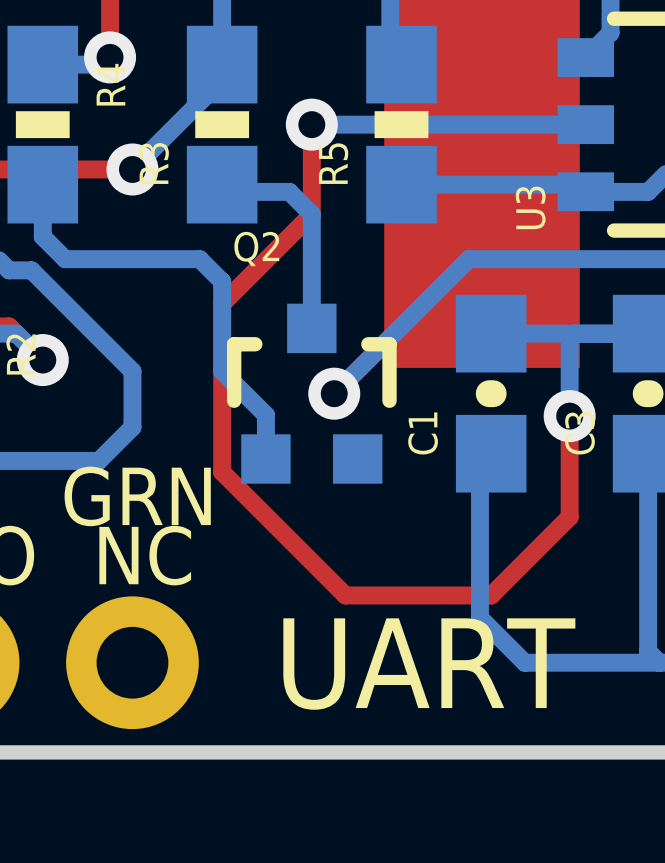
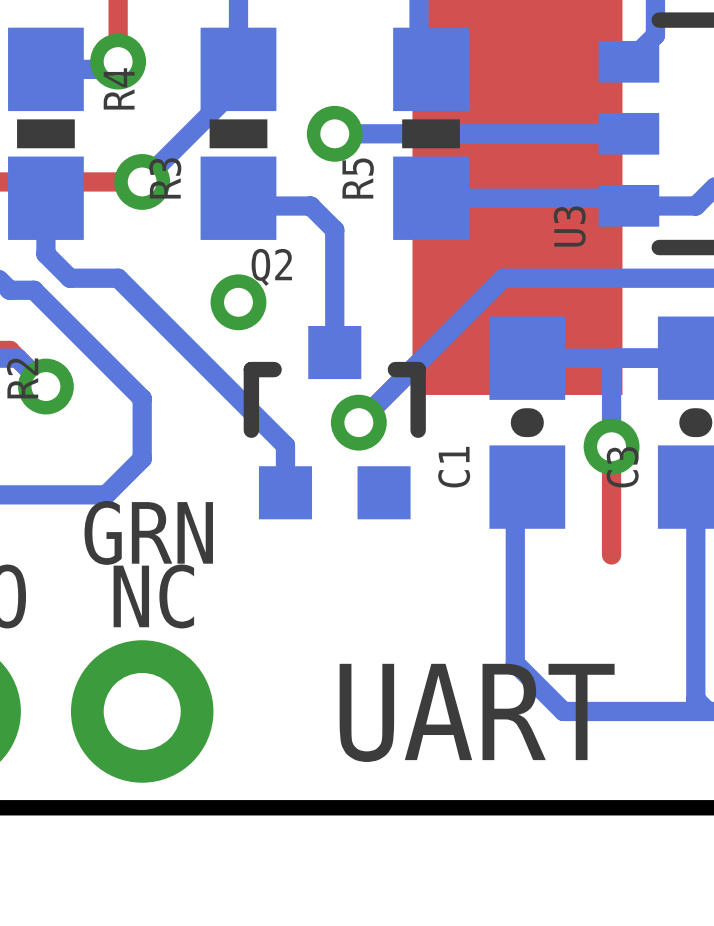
top track: (311, 124) (311, 214) (222, 304) (222, 472) (345, 595) (491, 595) (569, 517) -> none
bottom track: (110, 259) (199, 259) (222, 281) (222, 371) -> (118, 278) (238, 398)
via: none -> (238, 302)

